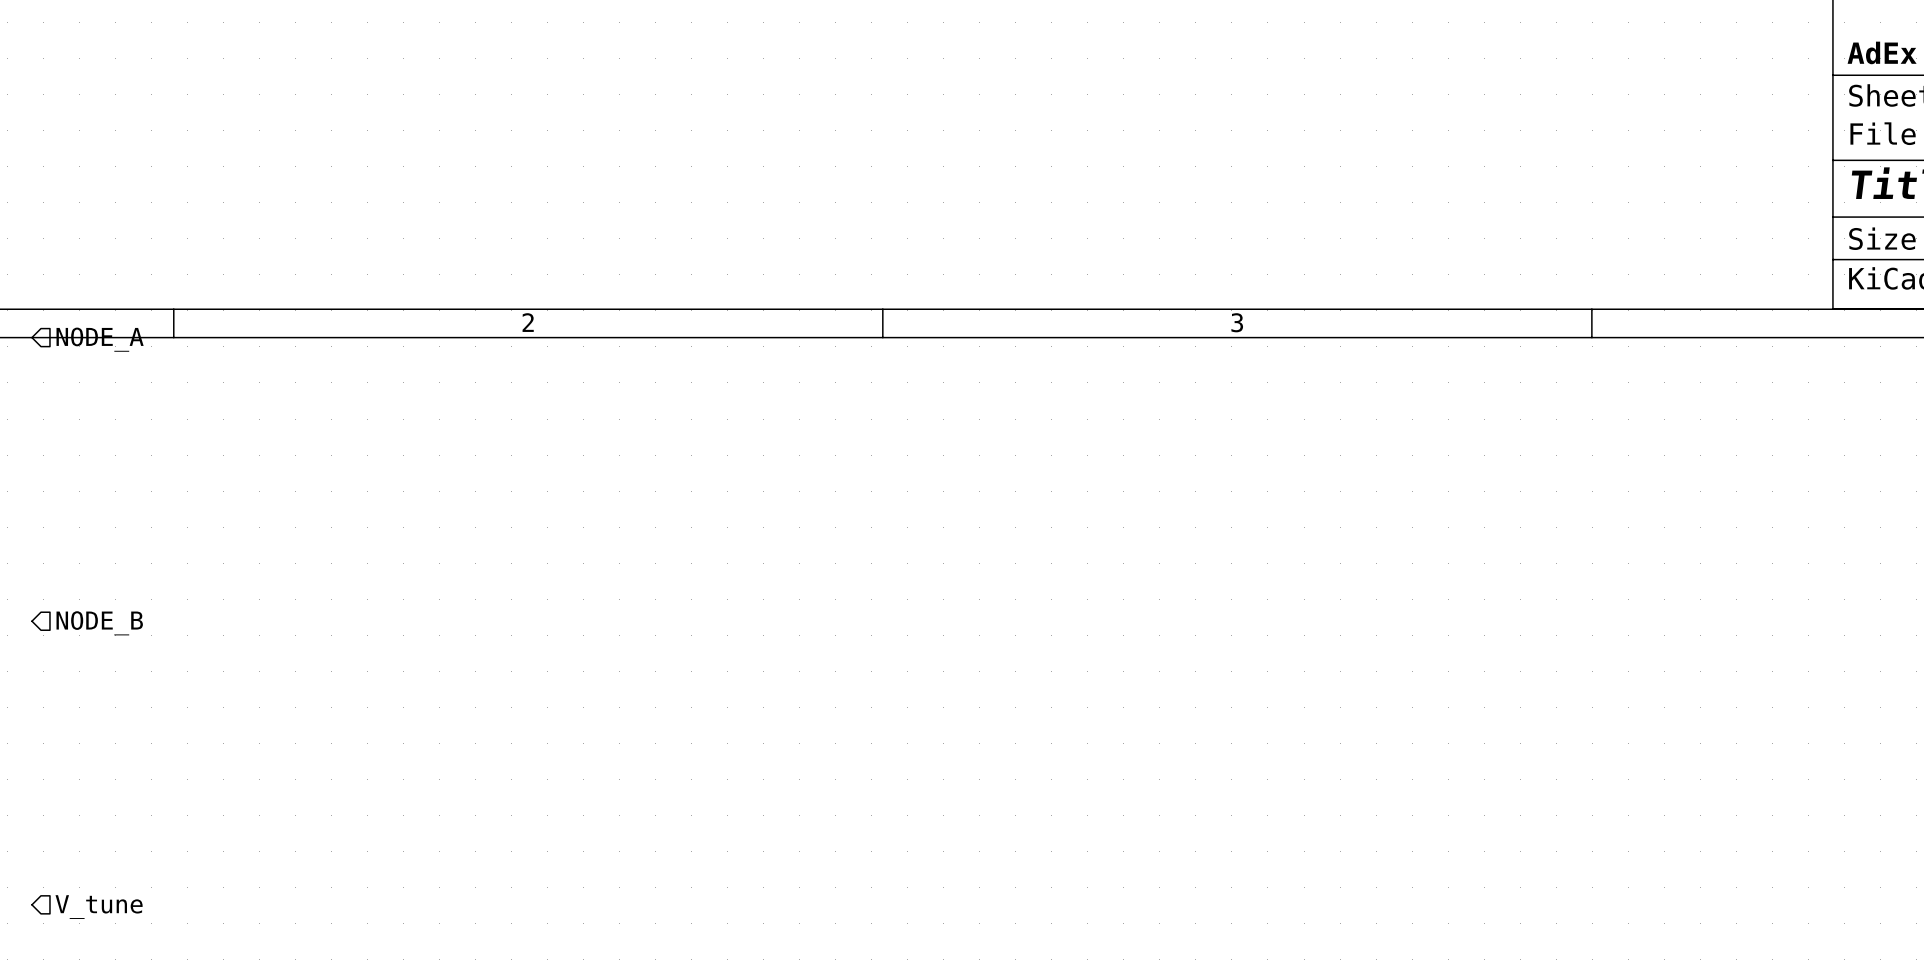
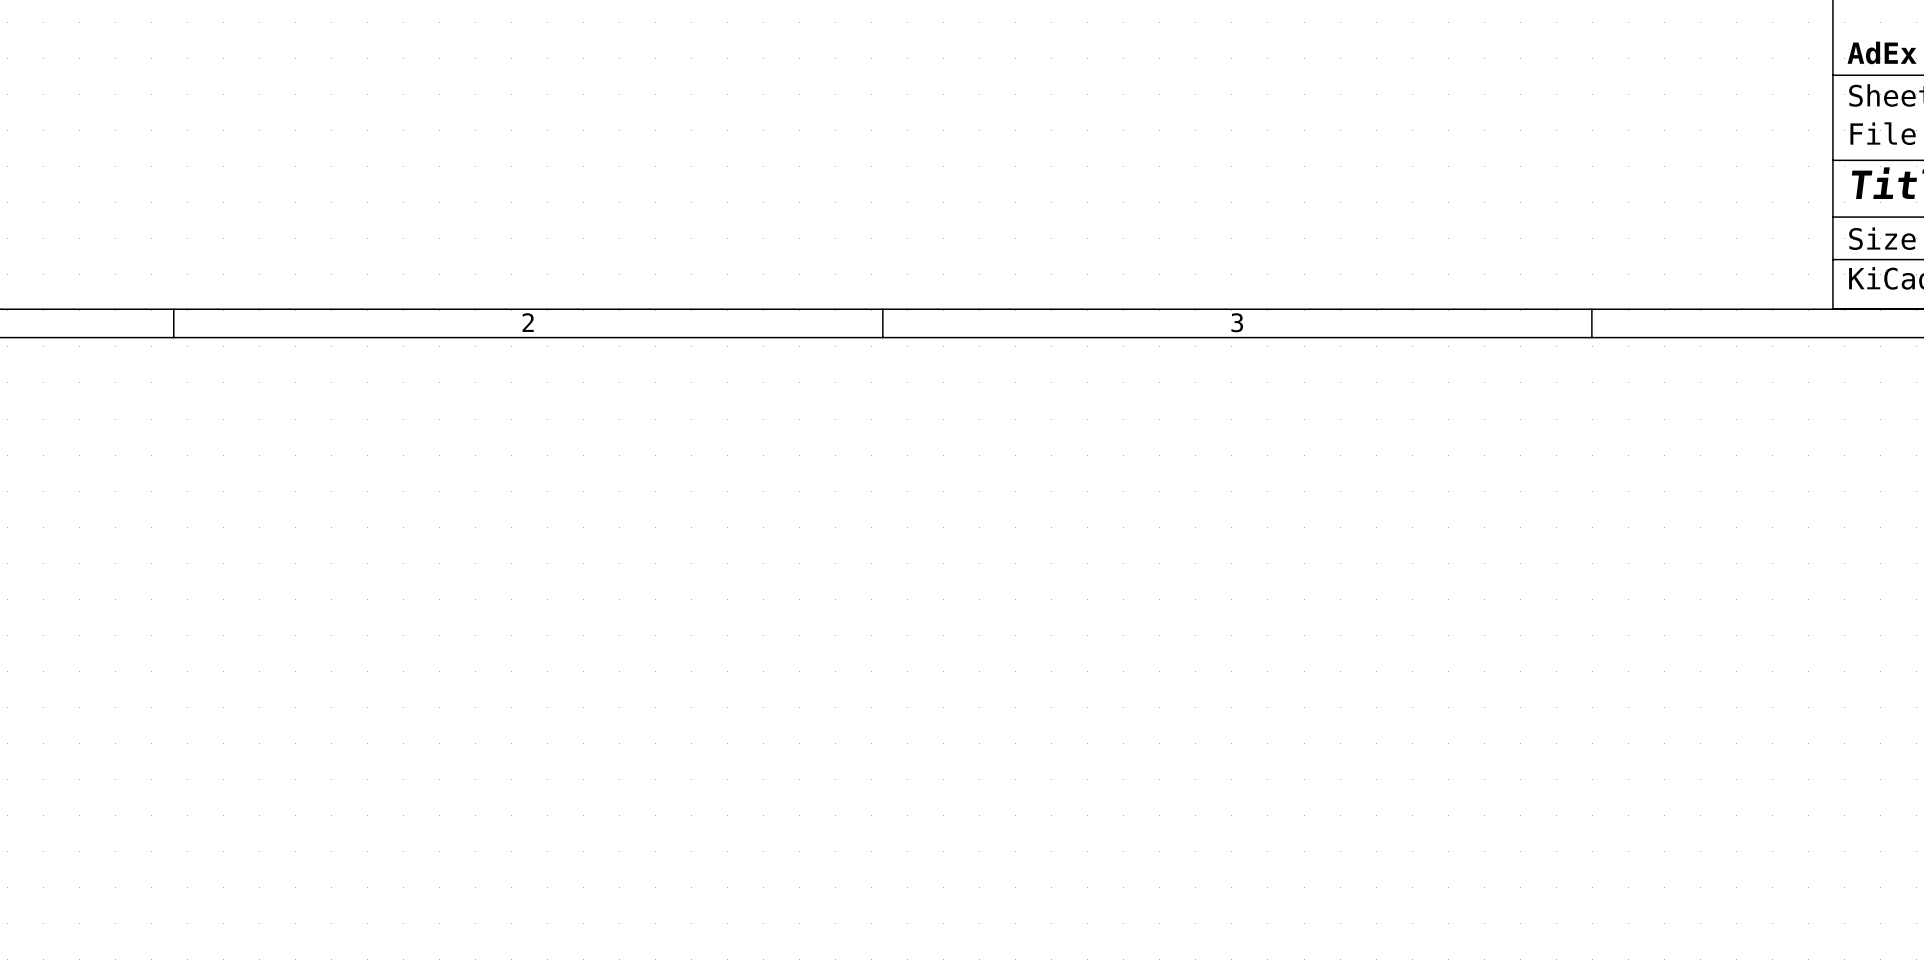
hierarchical label: NODE_A (100, 339) -> none
hierarchical label: NODE_B (99, 623) -> none
hierarchical label: V_tune (99, 907) -> none

